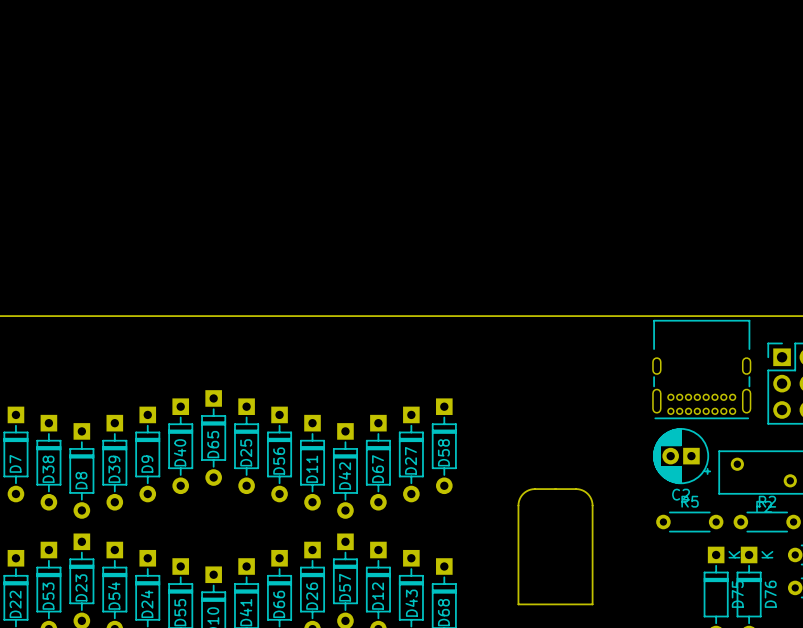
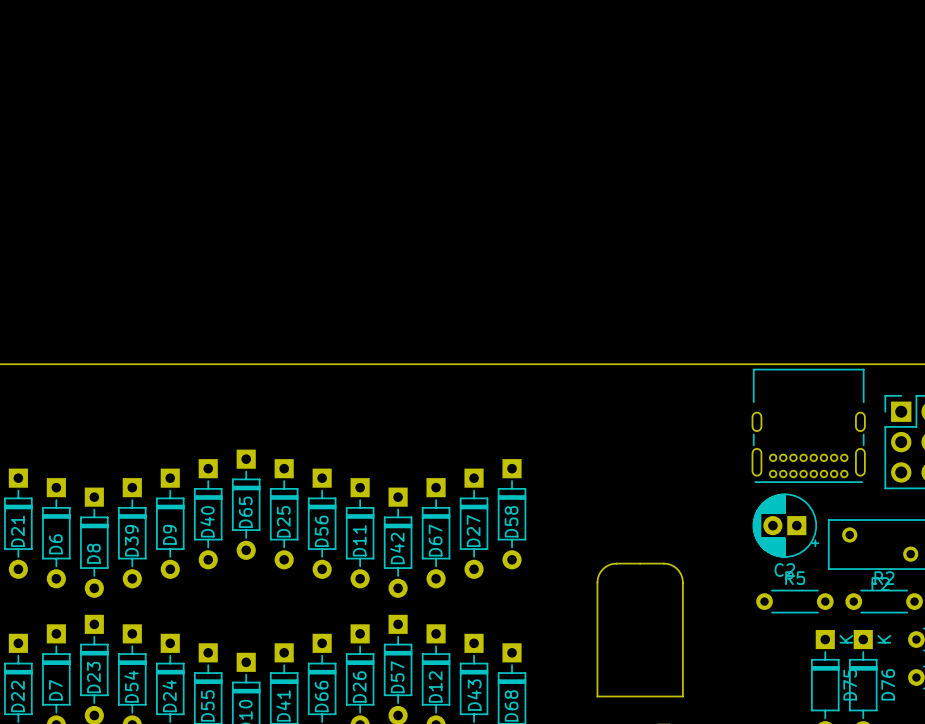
D7 name: D7 (15, 463) -> D21 (17, 531)
D38 name: D38 (48, 469) -> D6 (55, 544)
D53 name: D53 (48, 596) -> D7 (55, 690)

